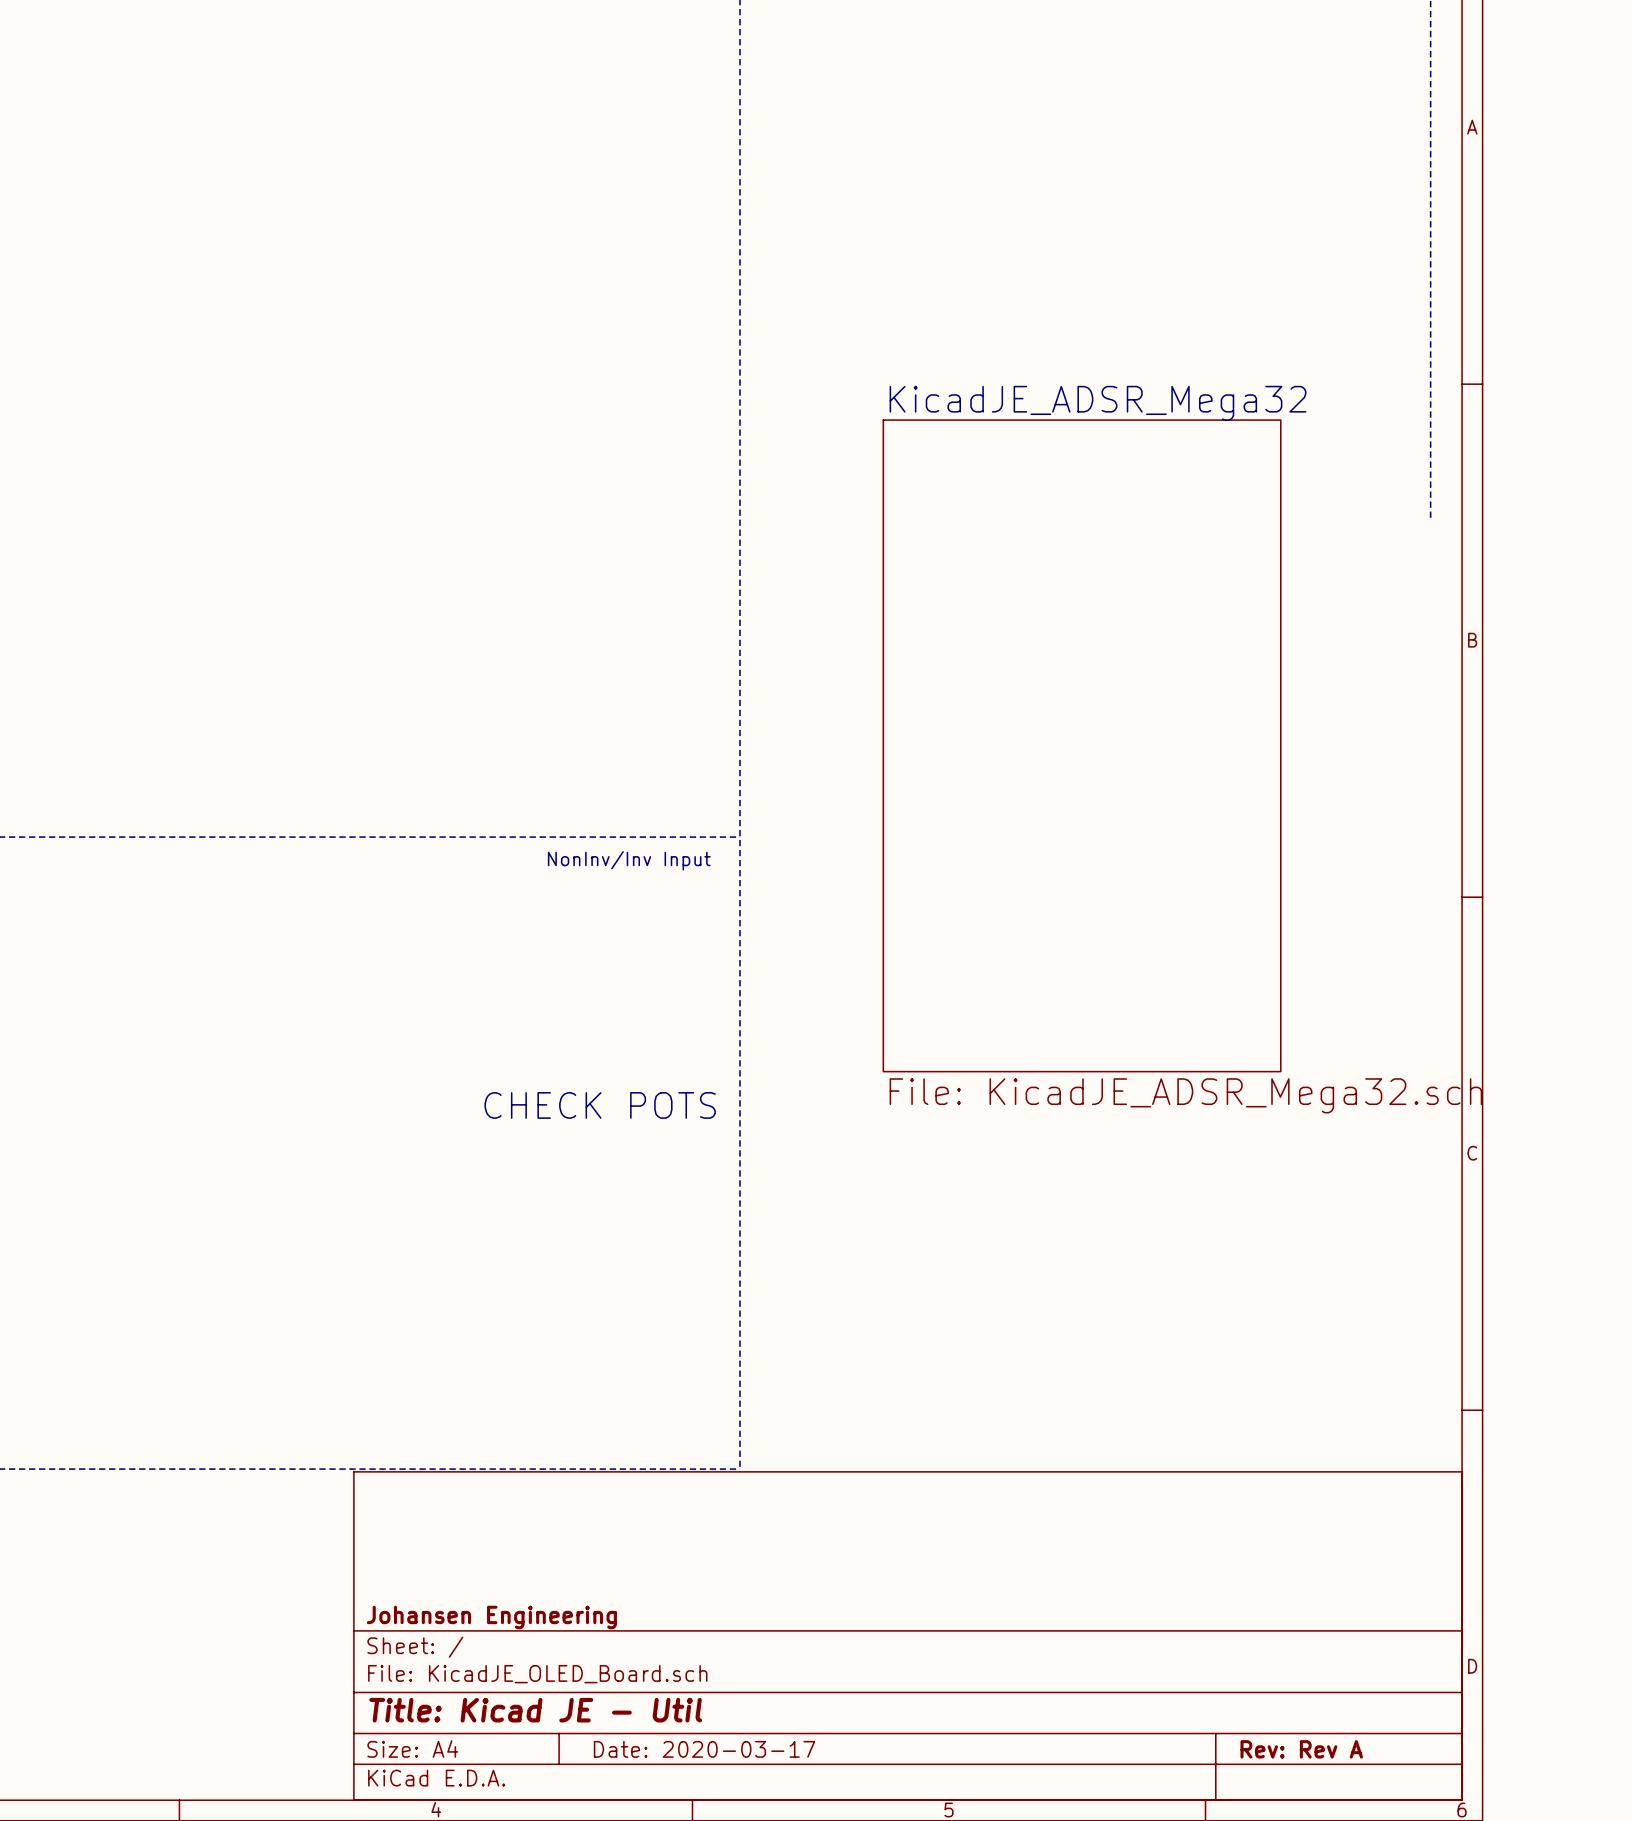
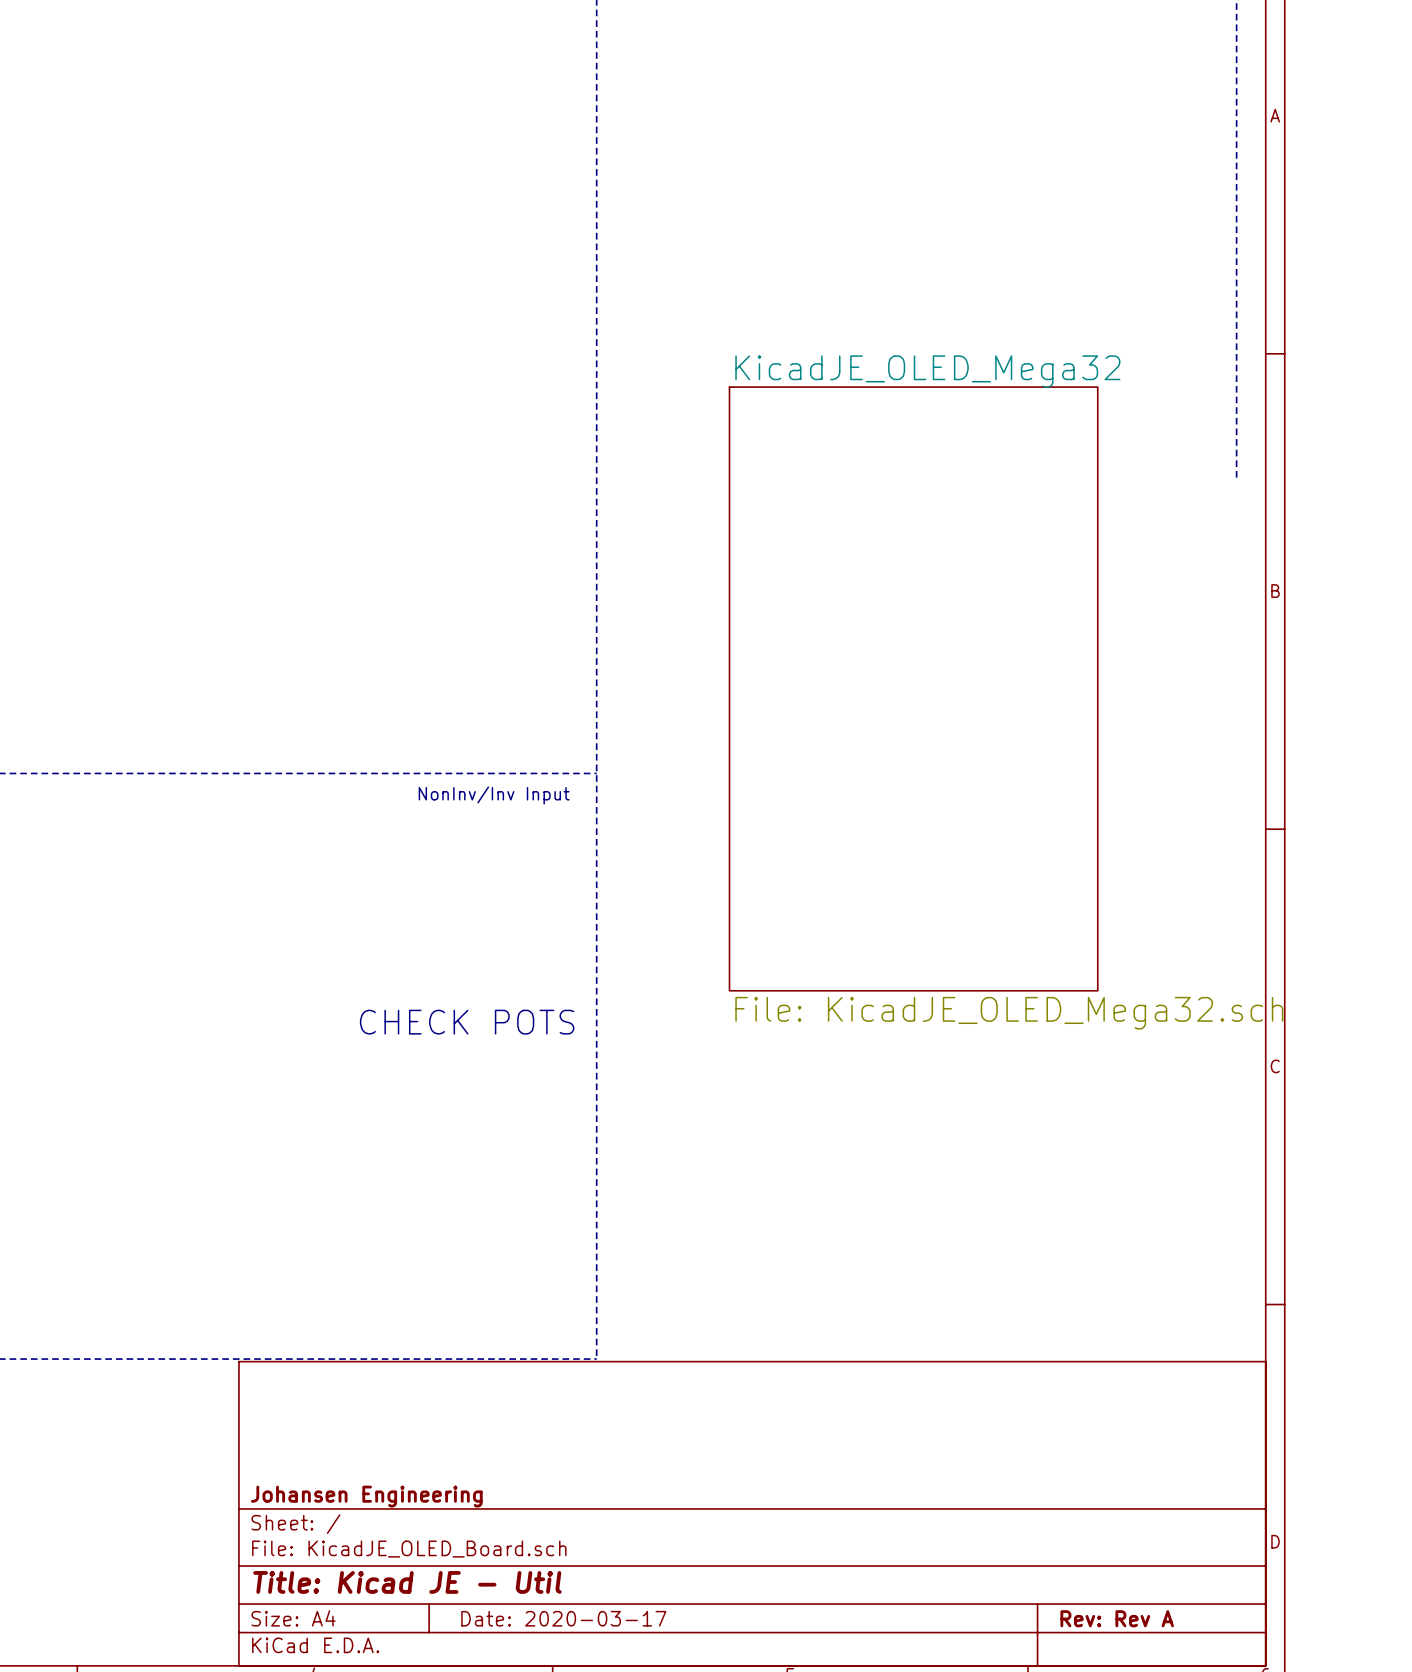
sheet KicadJE_ADSR_Mega32 name: KicadJE_ADSR_Mega32 (1098, 403) -> KicadJE_OLED_Mega32 (927, 371)
sheet KicadJE_ADSR_Mega32 value: File: KicadJE_ADSR_Mega32.sch (1185, 1095) -> File: KicadJE_OLED_Mega32.sch (1009, 1013)

